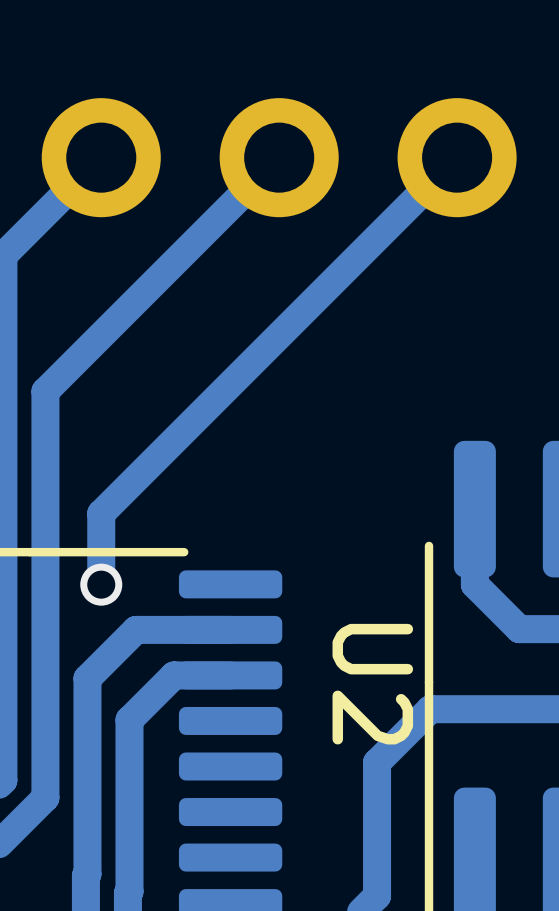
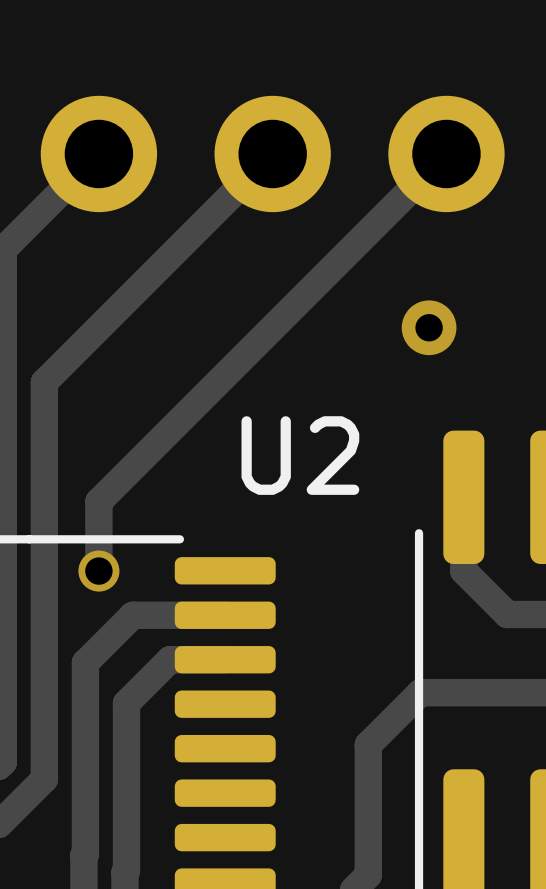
via: none -> (429, 327)
U2 name rotation: 0° (372, 684) -> 90° counterclockwise (300, 455)
U2 name position: U2 (372, 684) -> U2 (300, 455)

